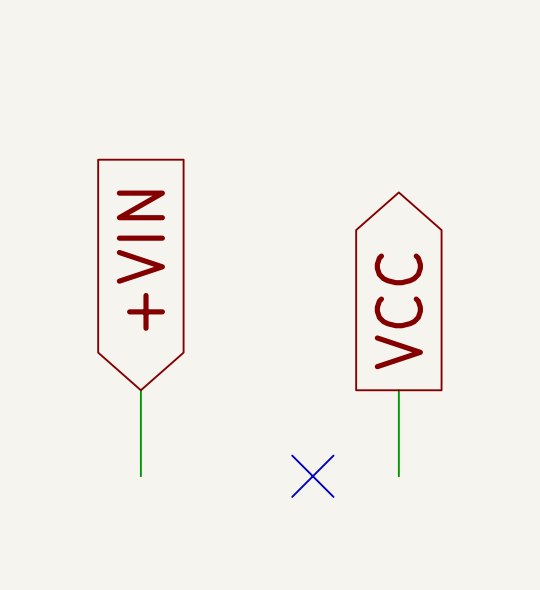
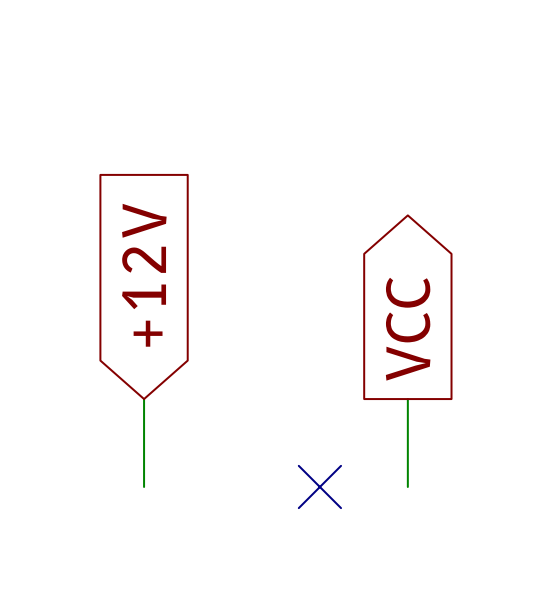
global label: +VIN (140, 260) -> +12V (144, 275)

